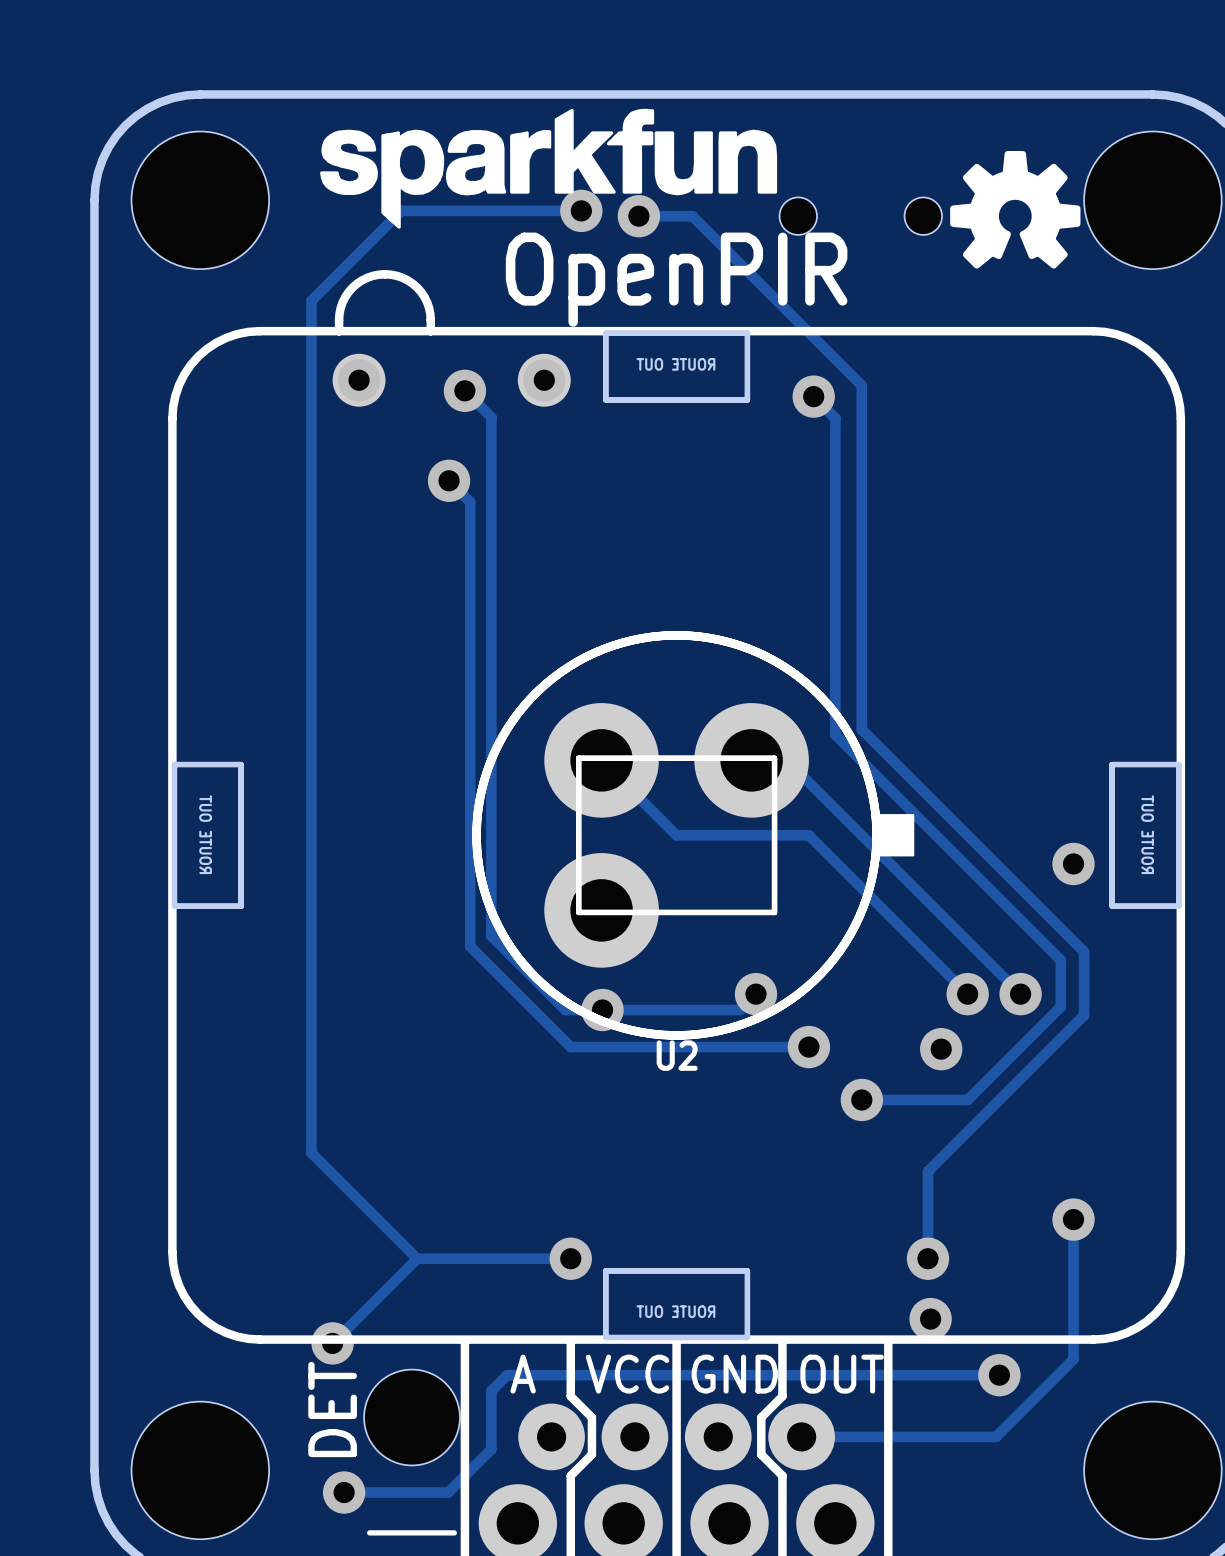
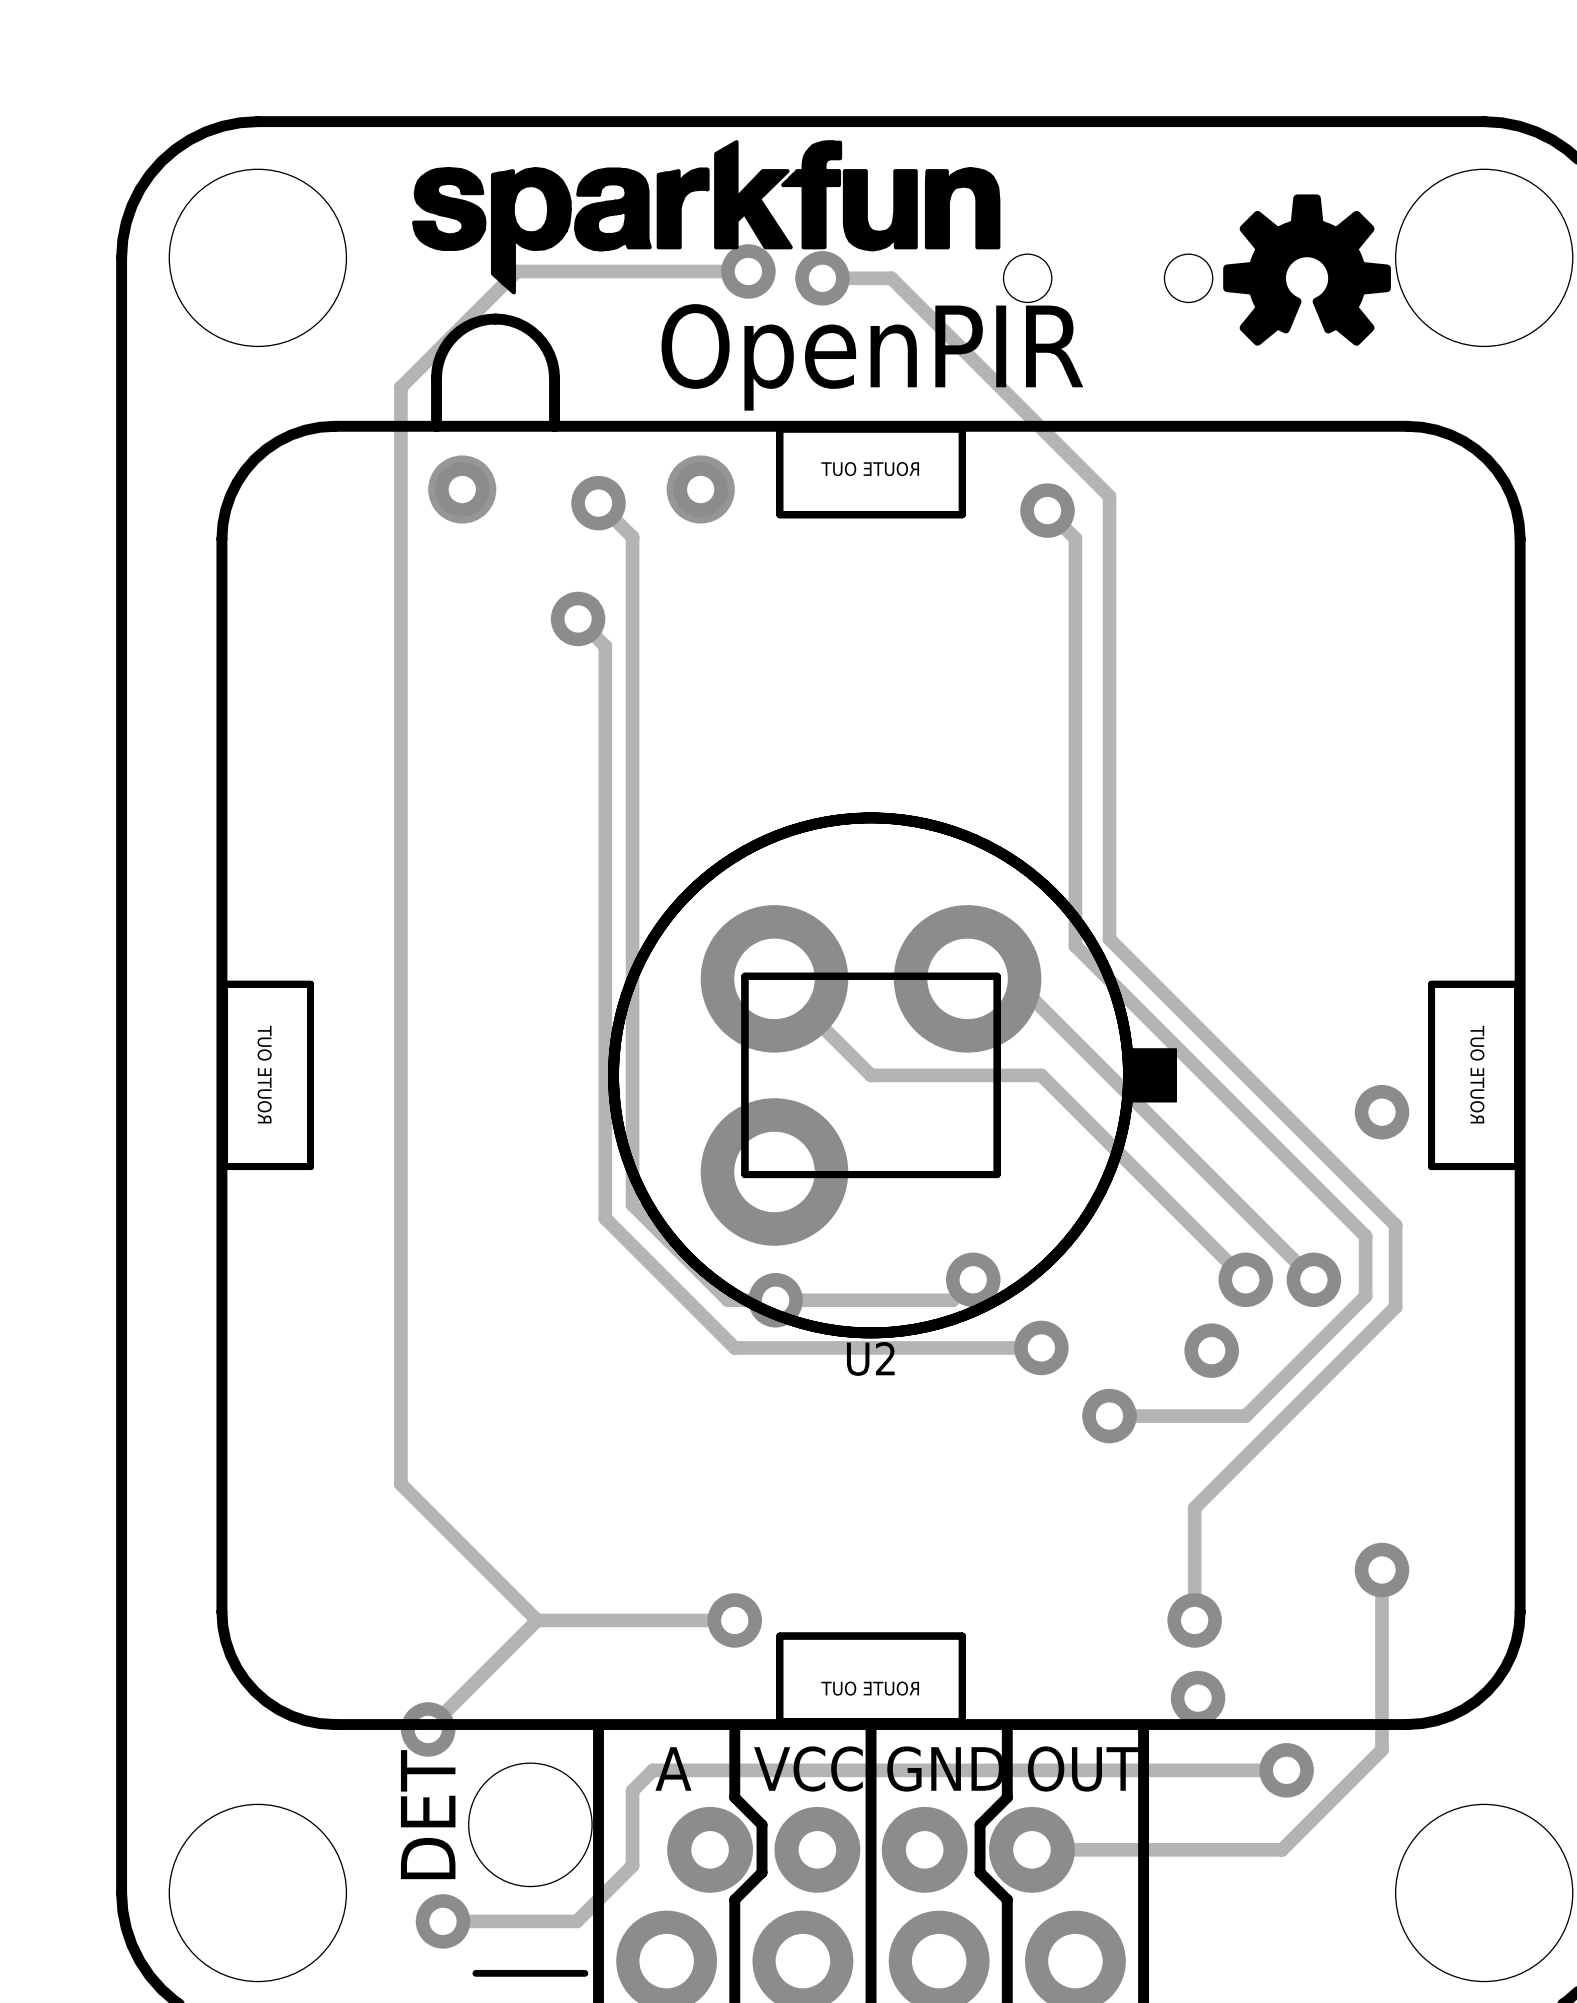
drawing shape: [168, 270, 1186, 1344] -> [216, 313, 1526, 1730]

